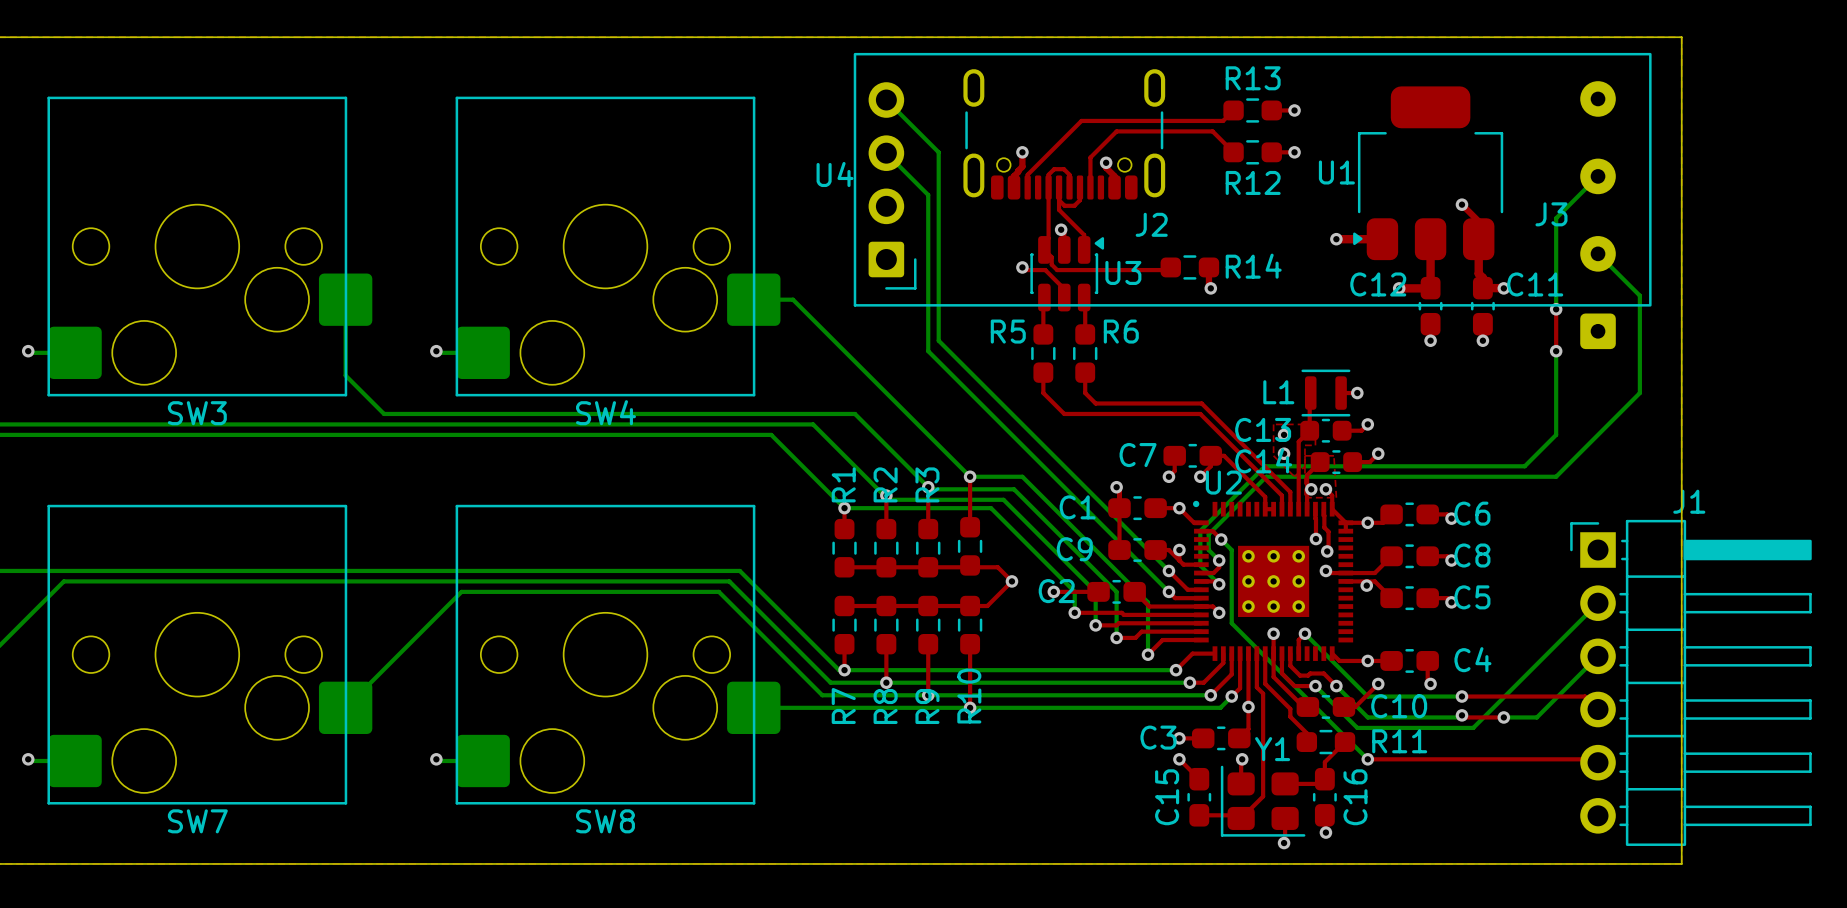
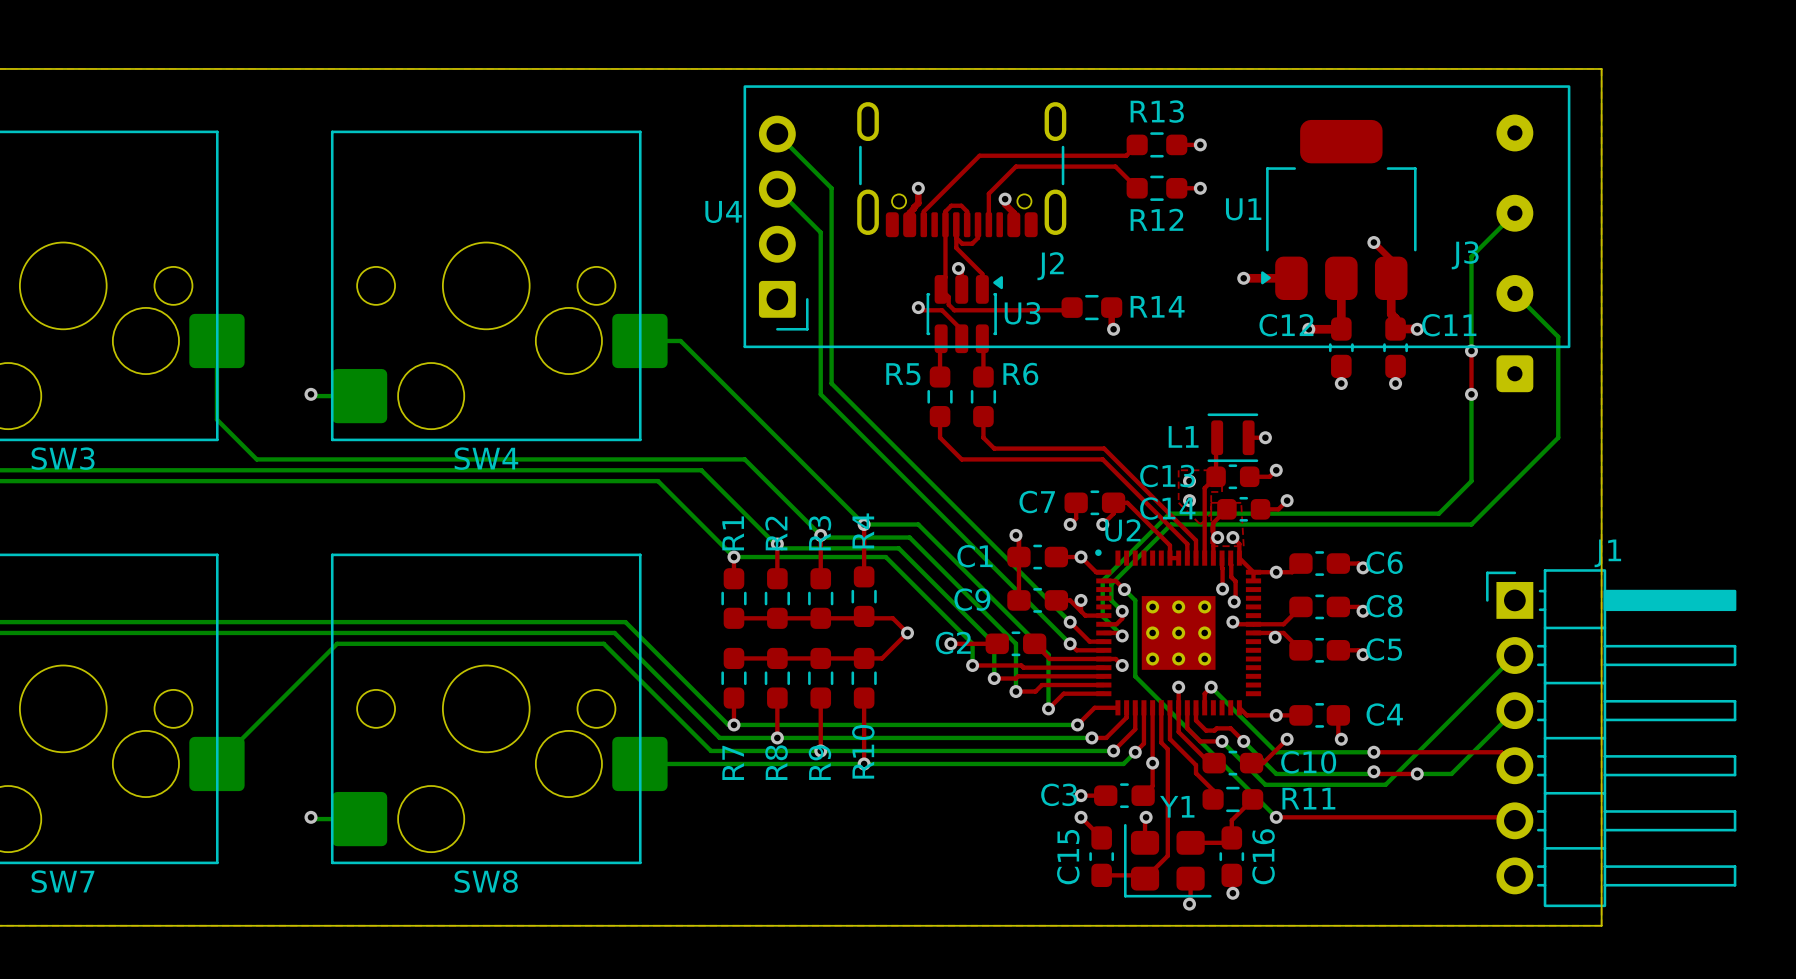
R4 name: none -> R4 (863, 530)

